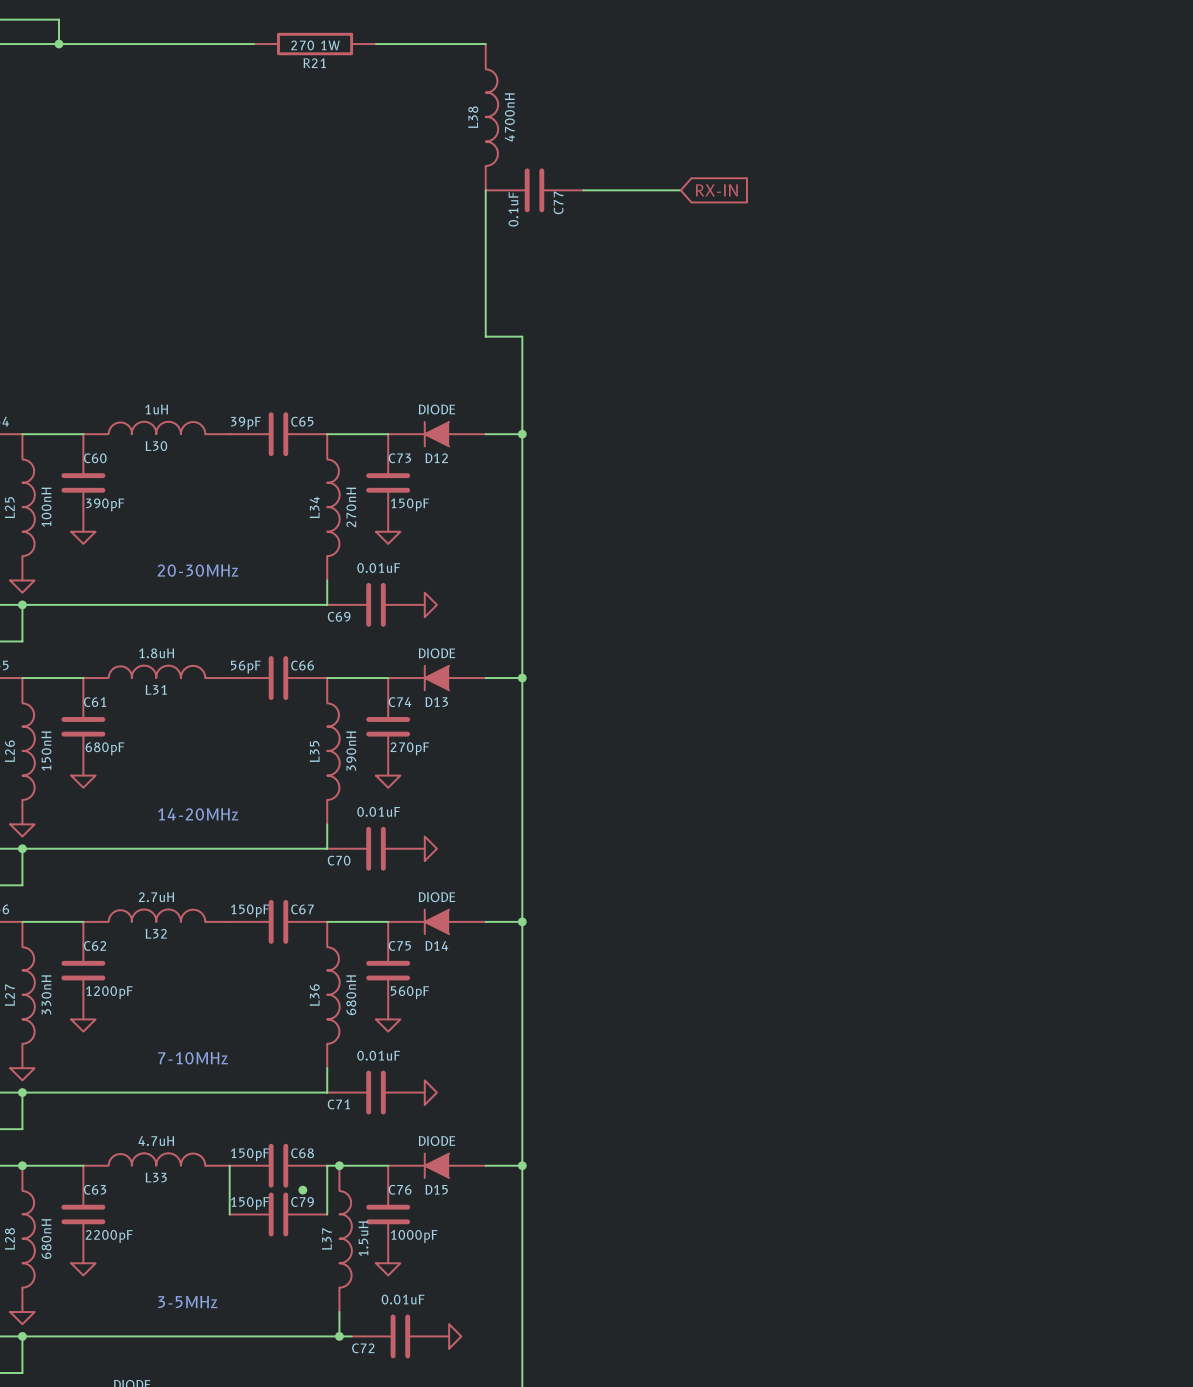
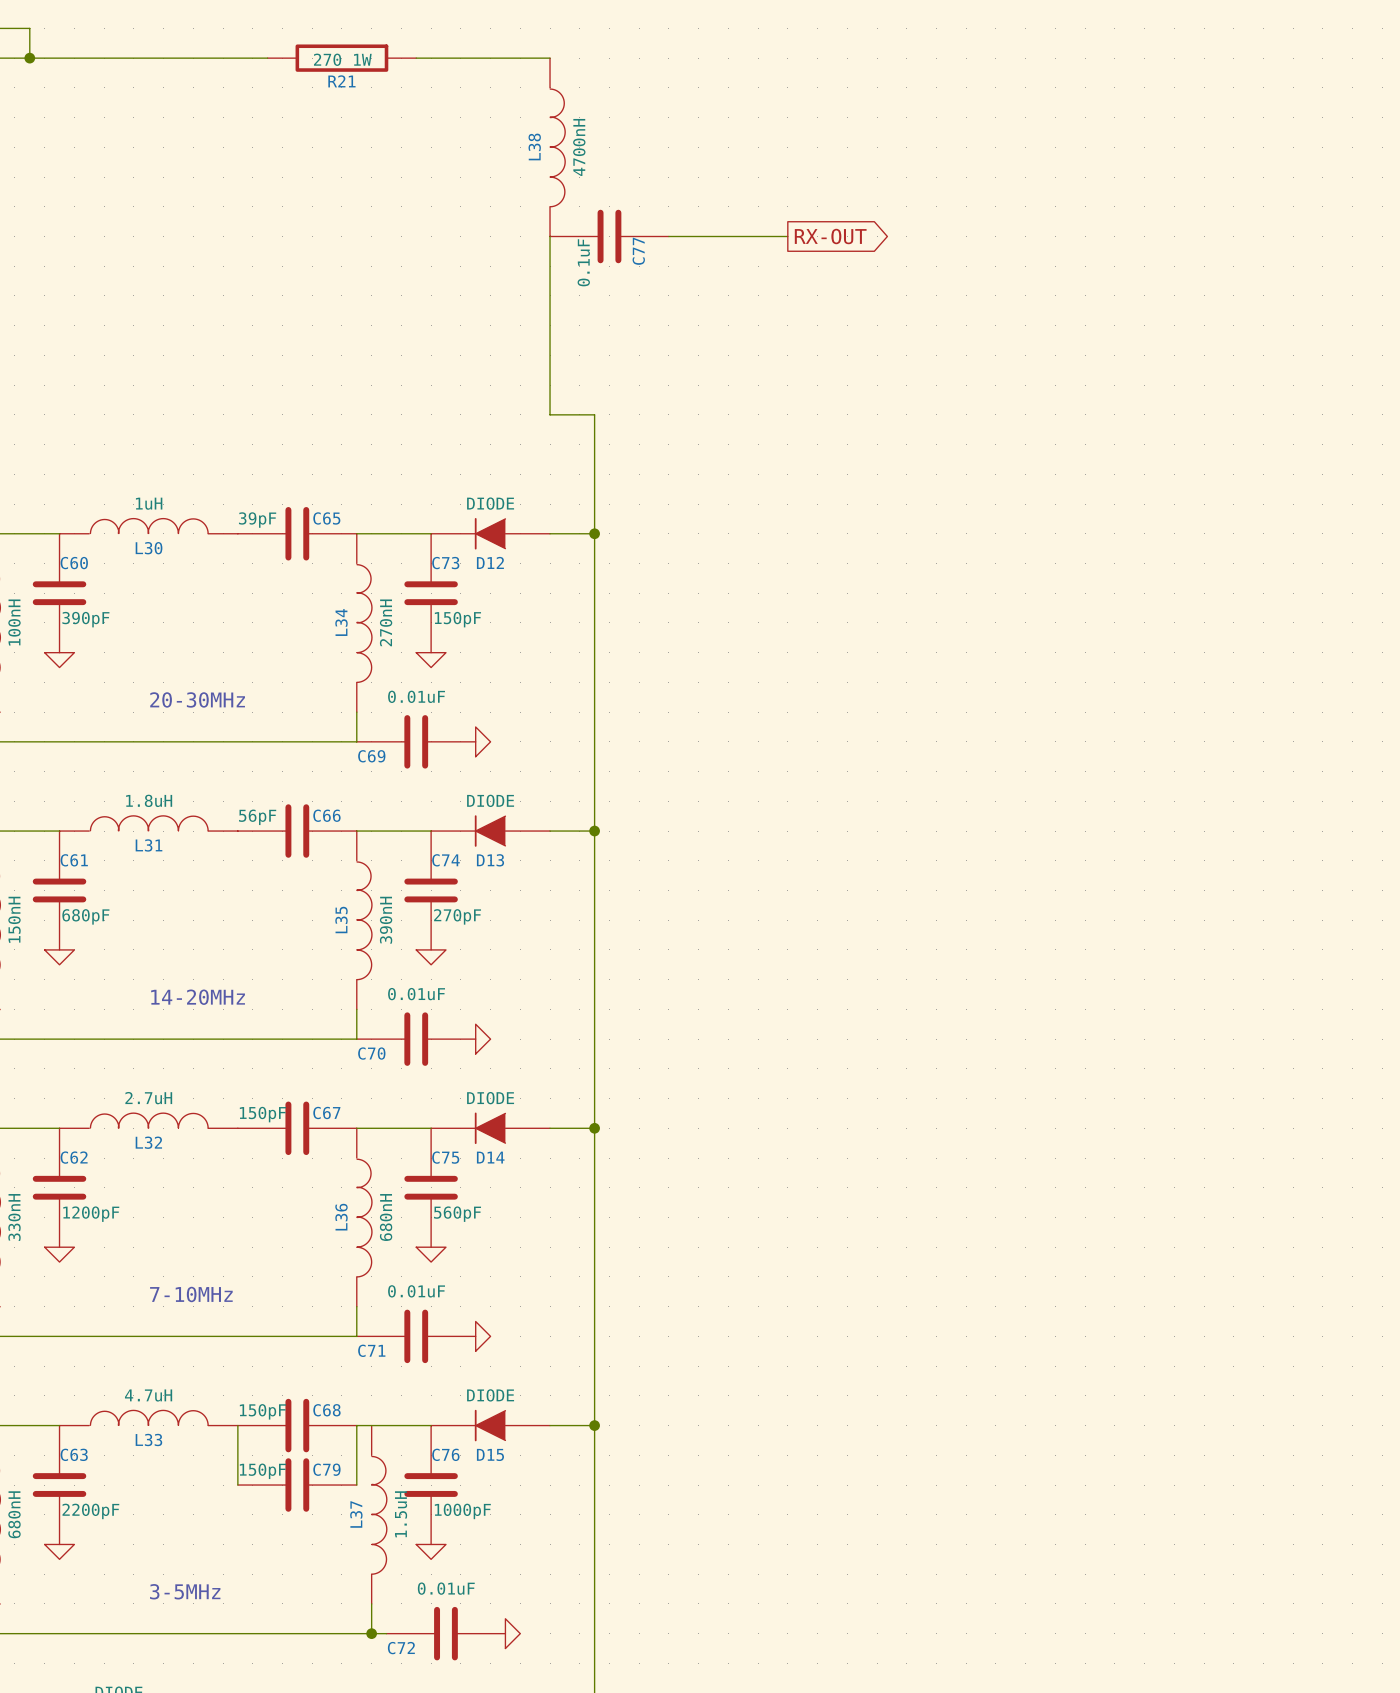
global label shape: input (716, 190) -> output (830, 236)
global label: RX-IN (716, 190) -> RX-OUT (830, 236)
junction: (339, 1165) -> none
junction: (302, 1190) -> none

